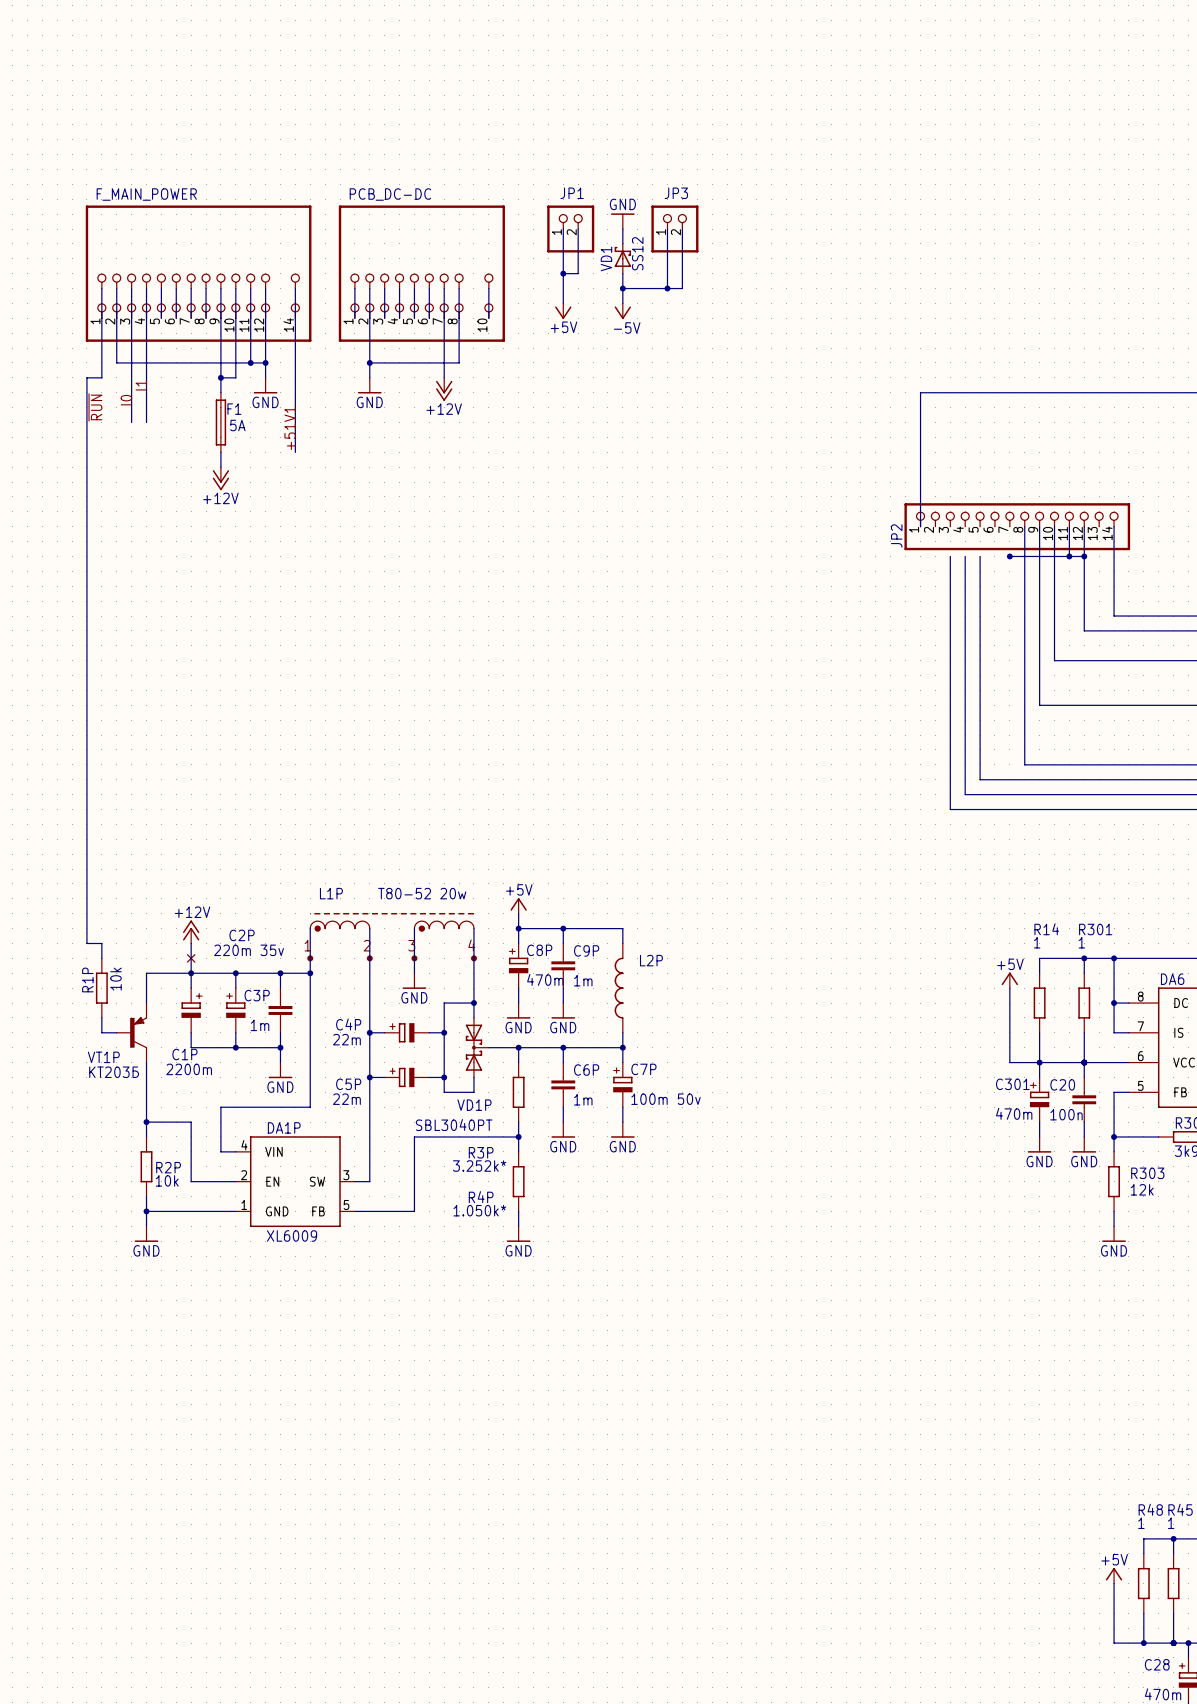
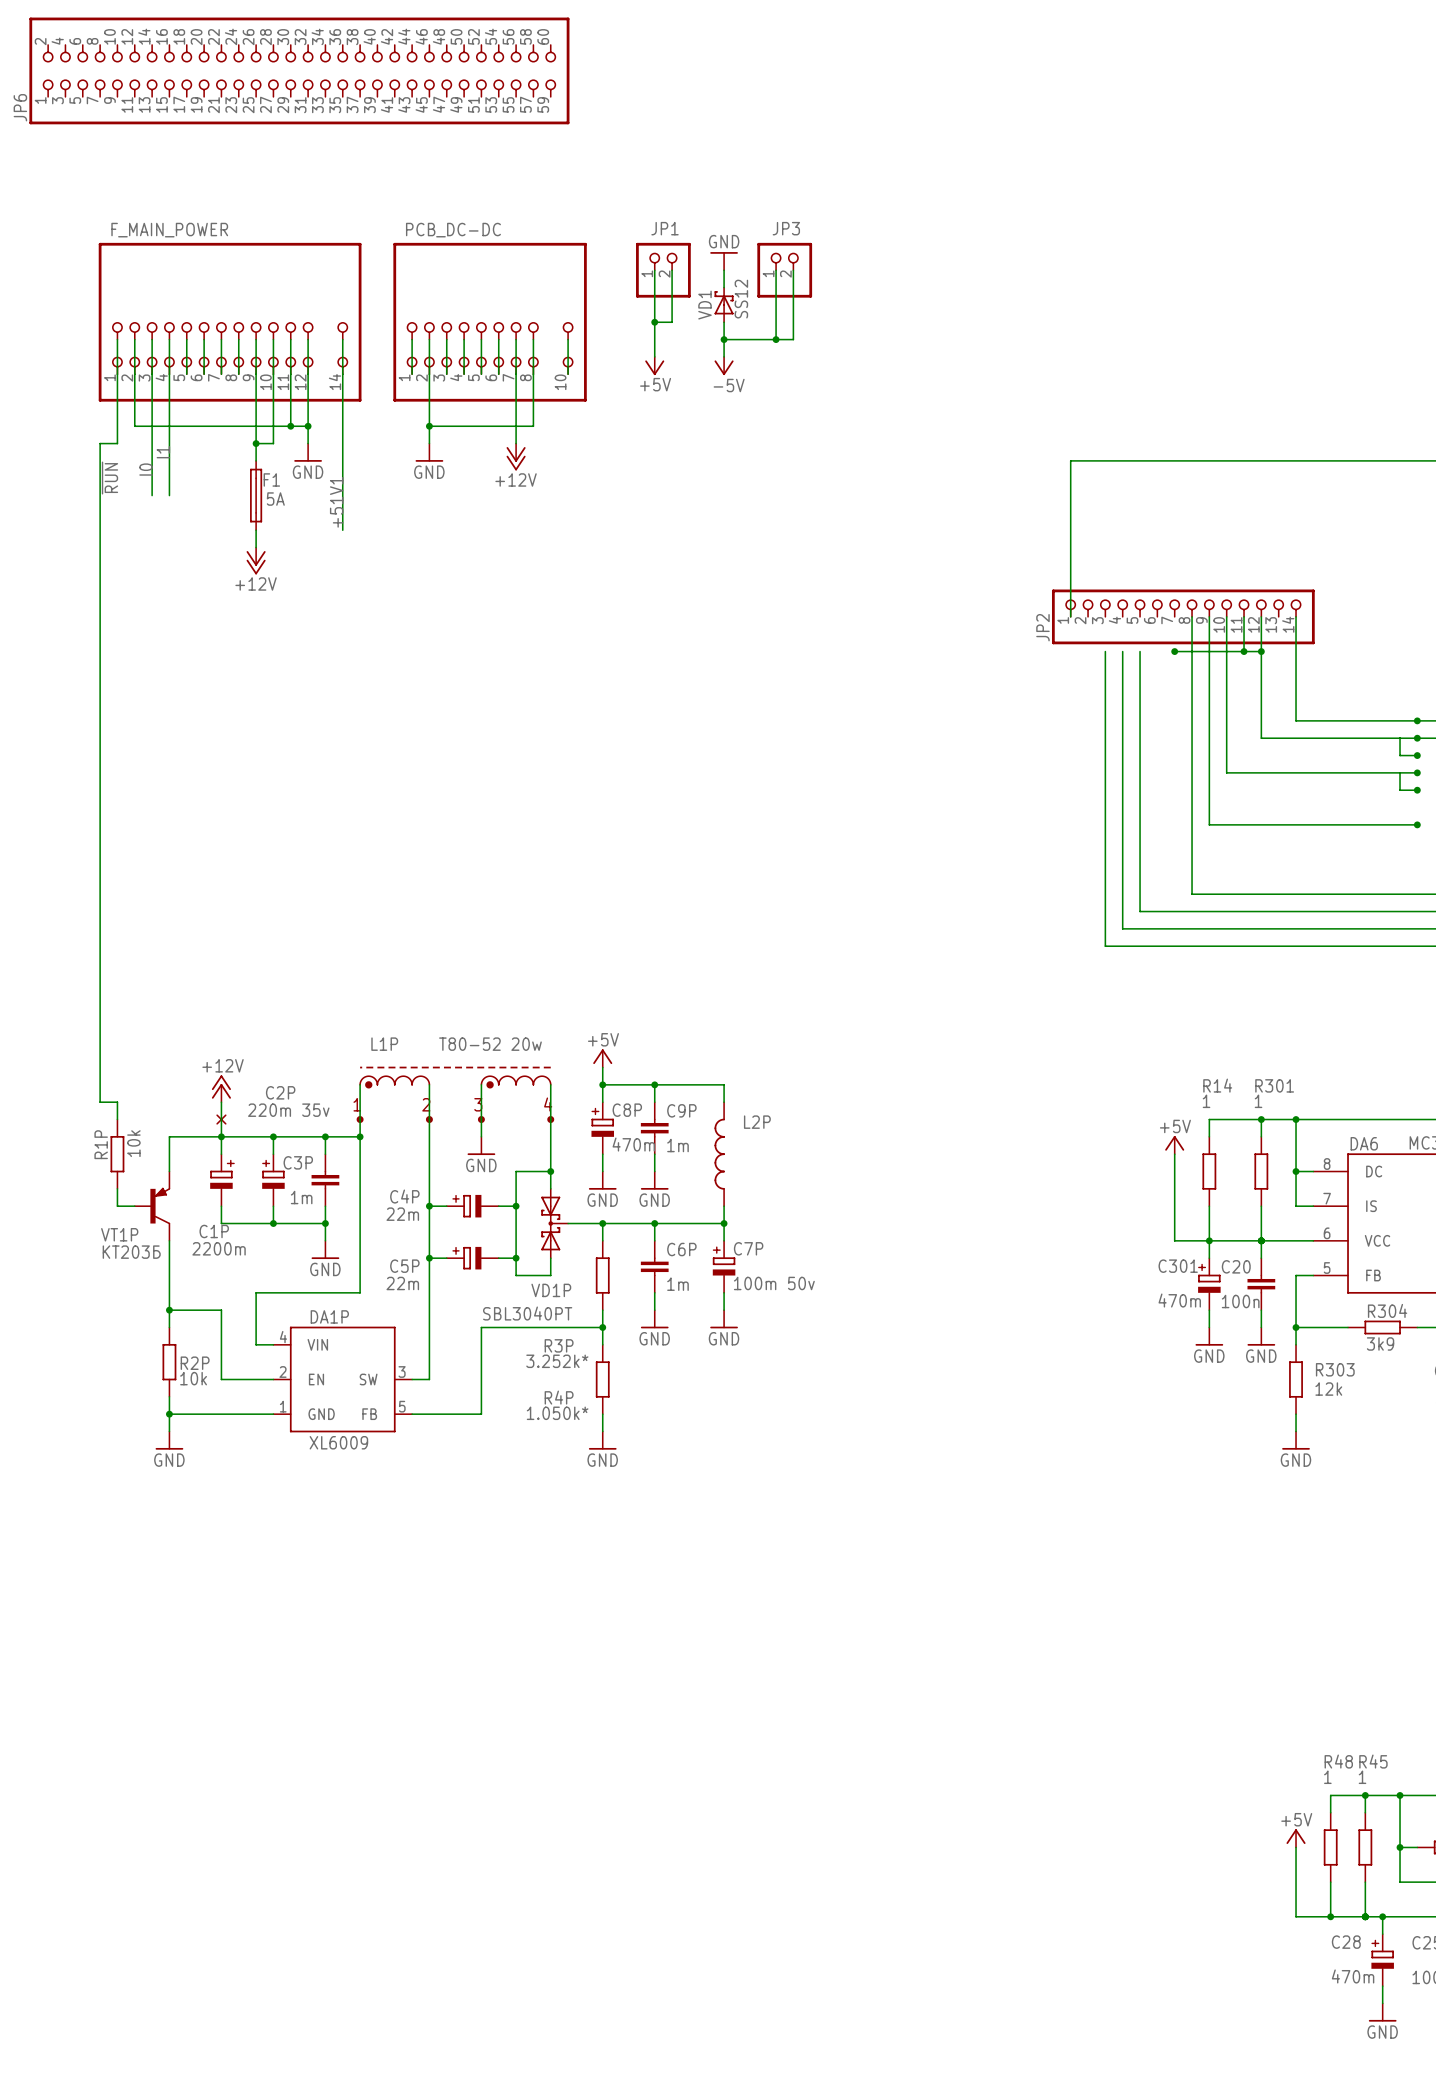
JP6: none -> (299, 70)

